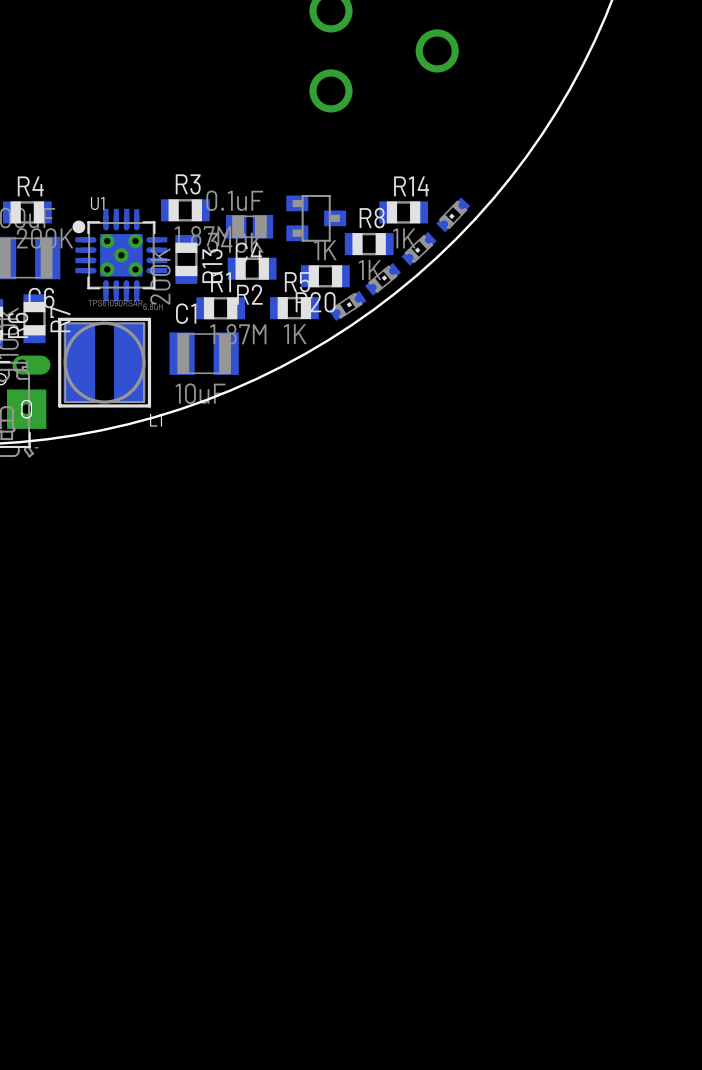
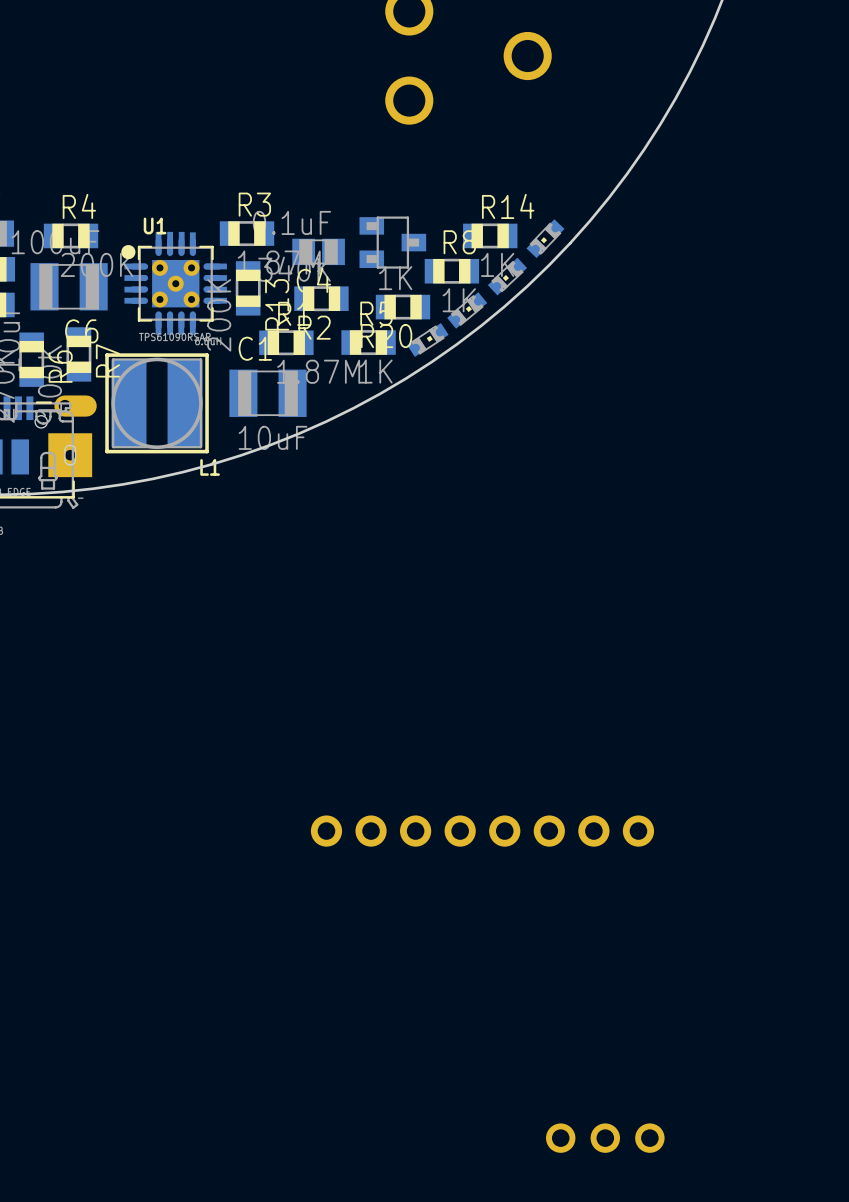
part: none -> (482, 831)
part: none -> (605, 1138)

